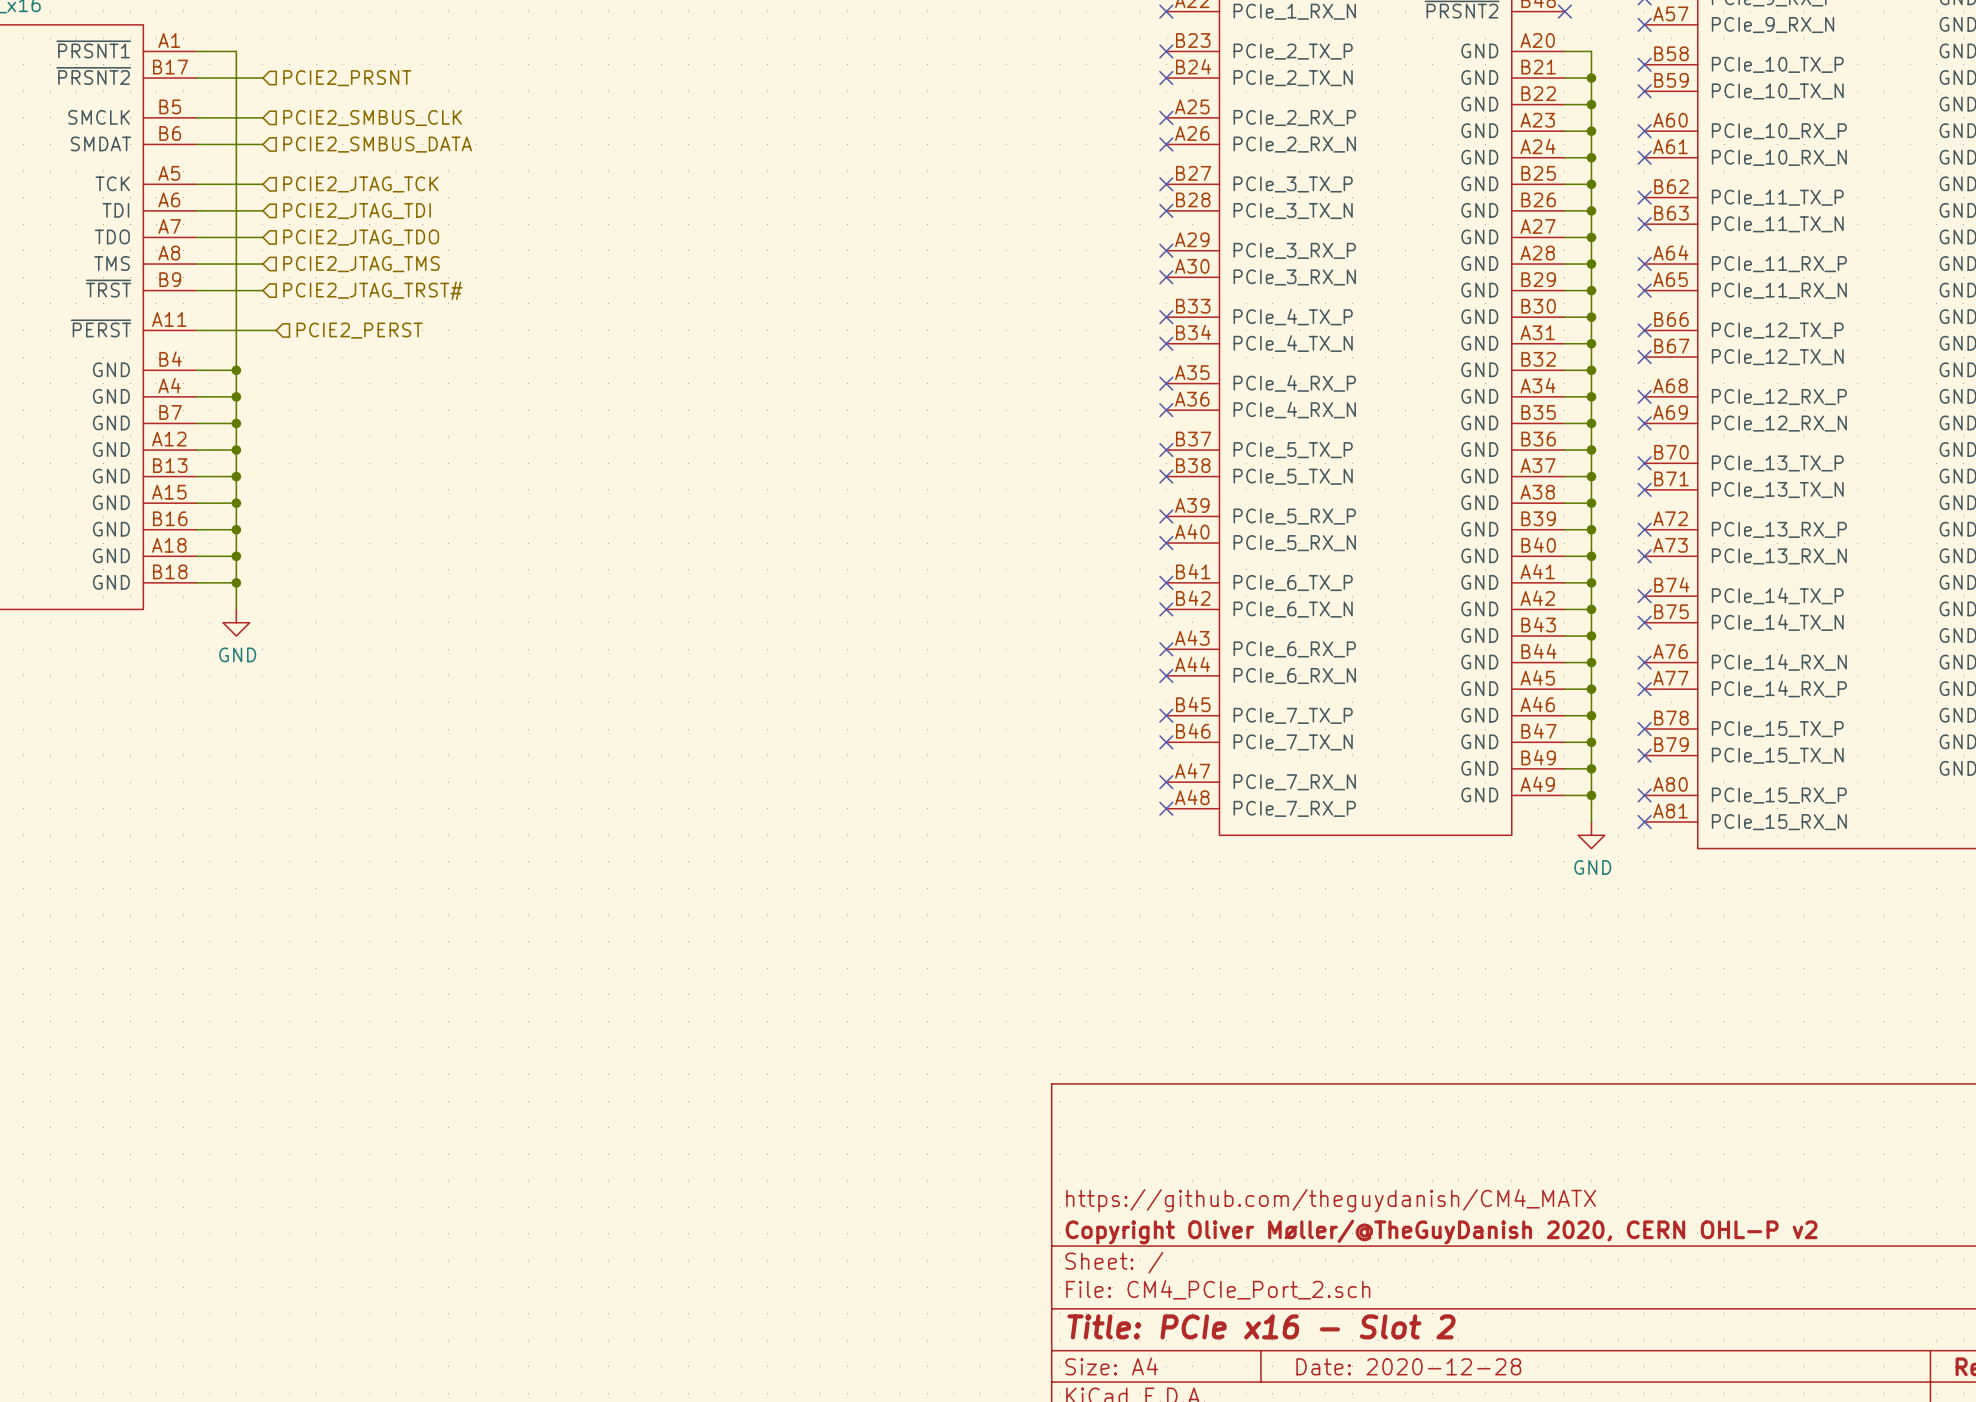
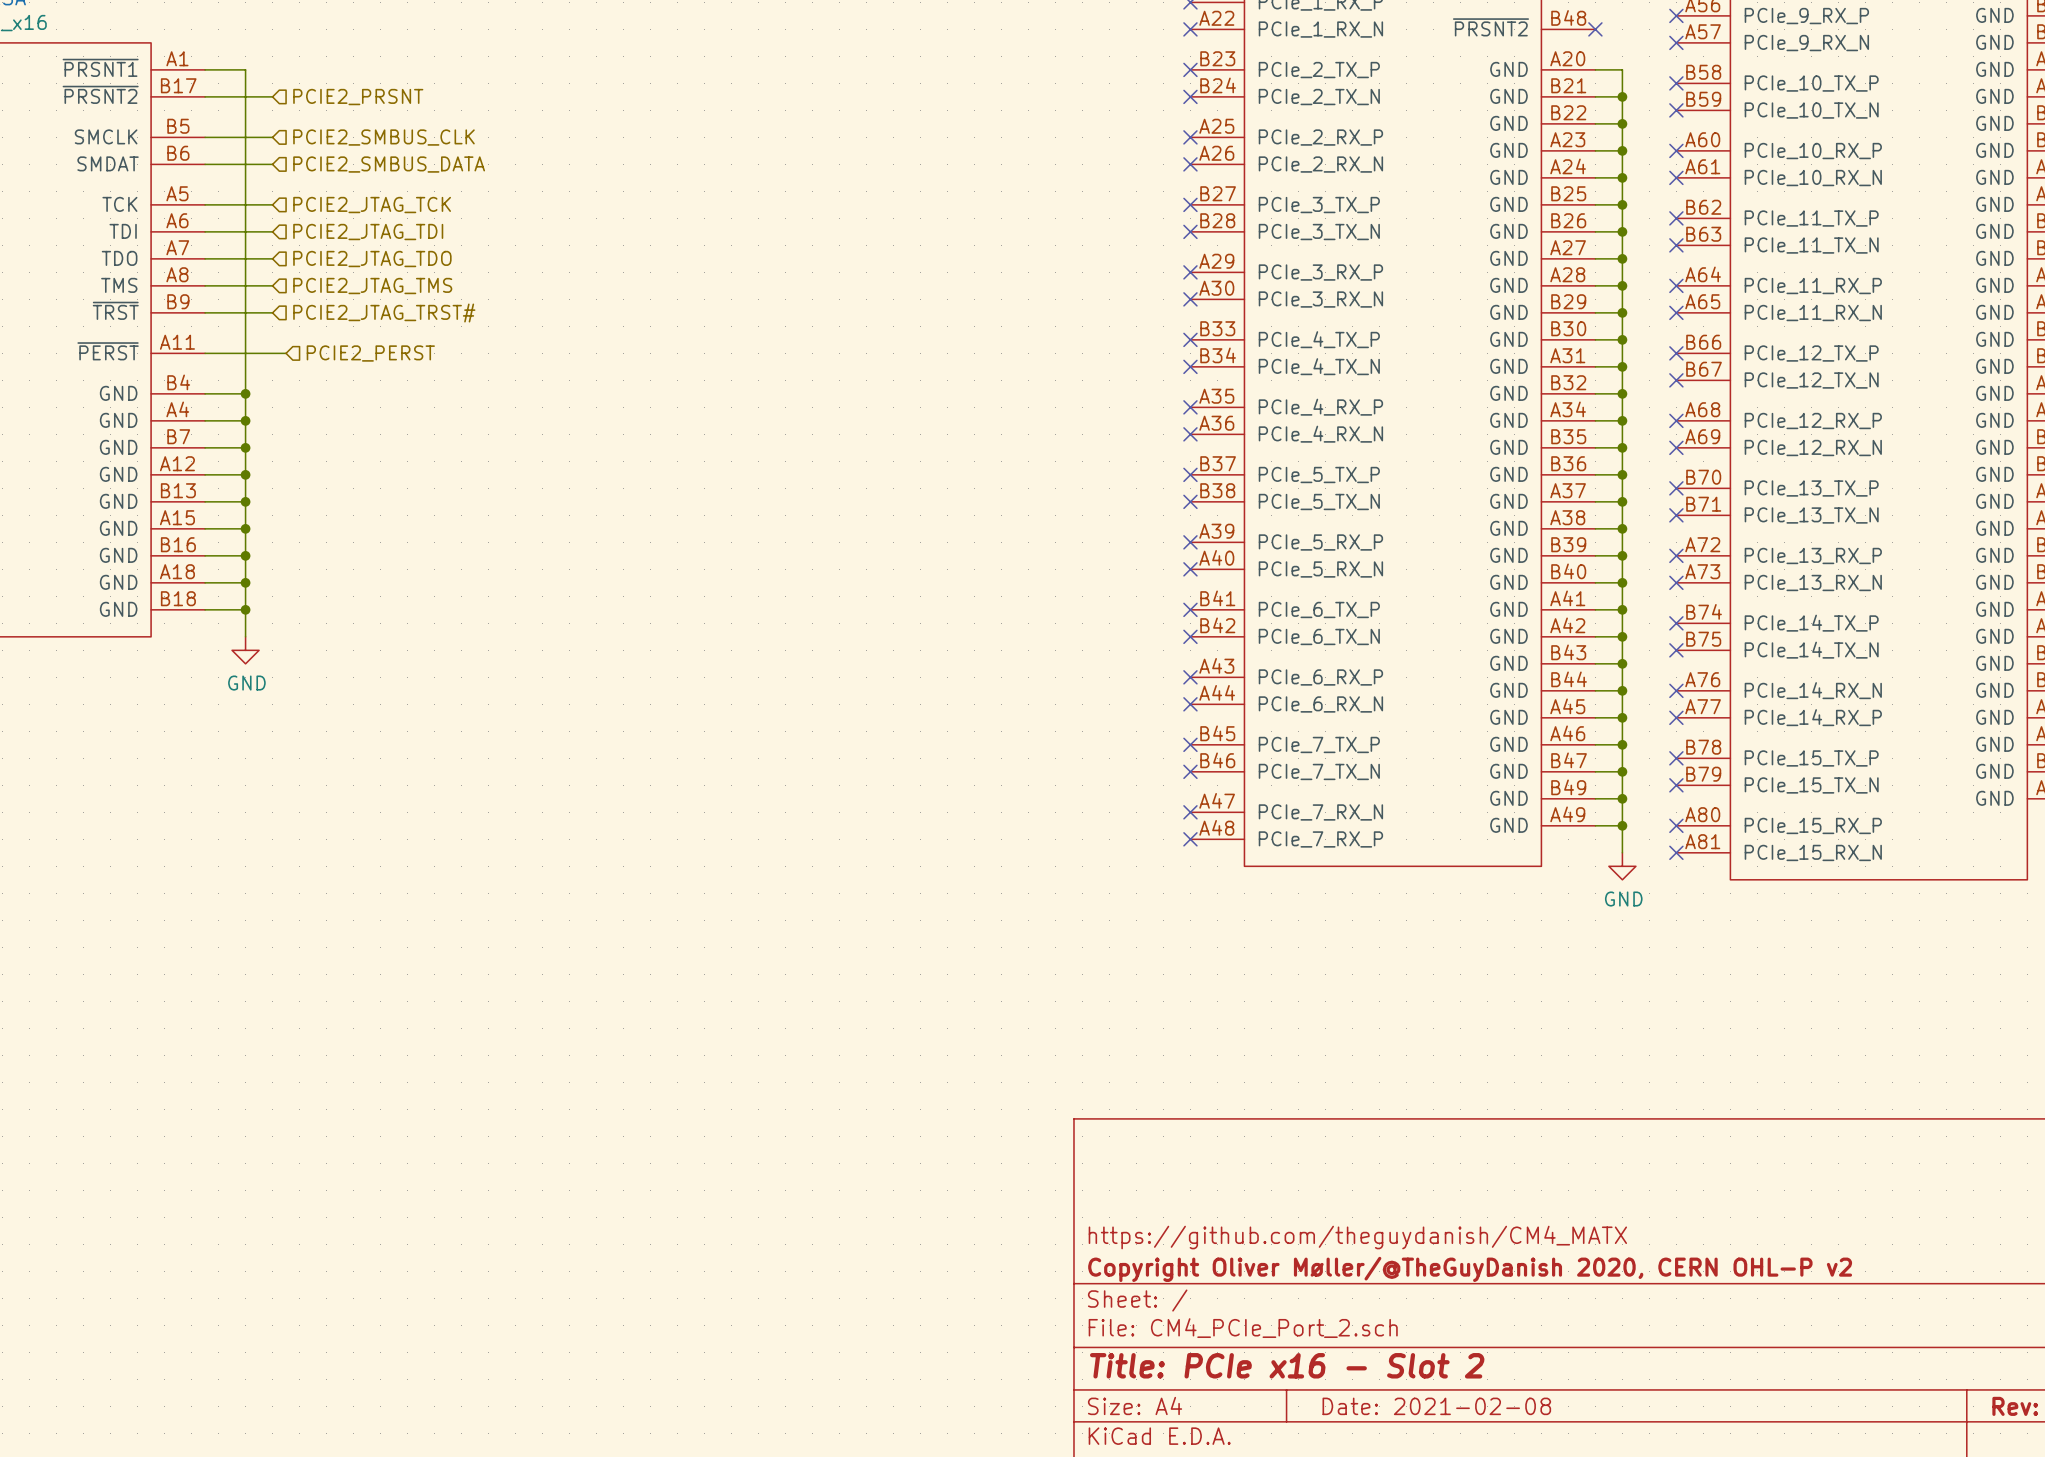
title block: Date: 2020-12-28 (1408, 1366) -> Date: 2021-02-08 (1436, 1406)

